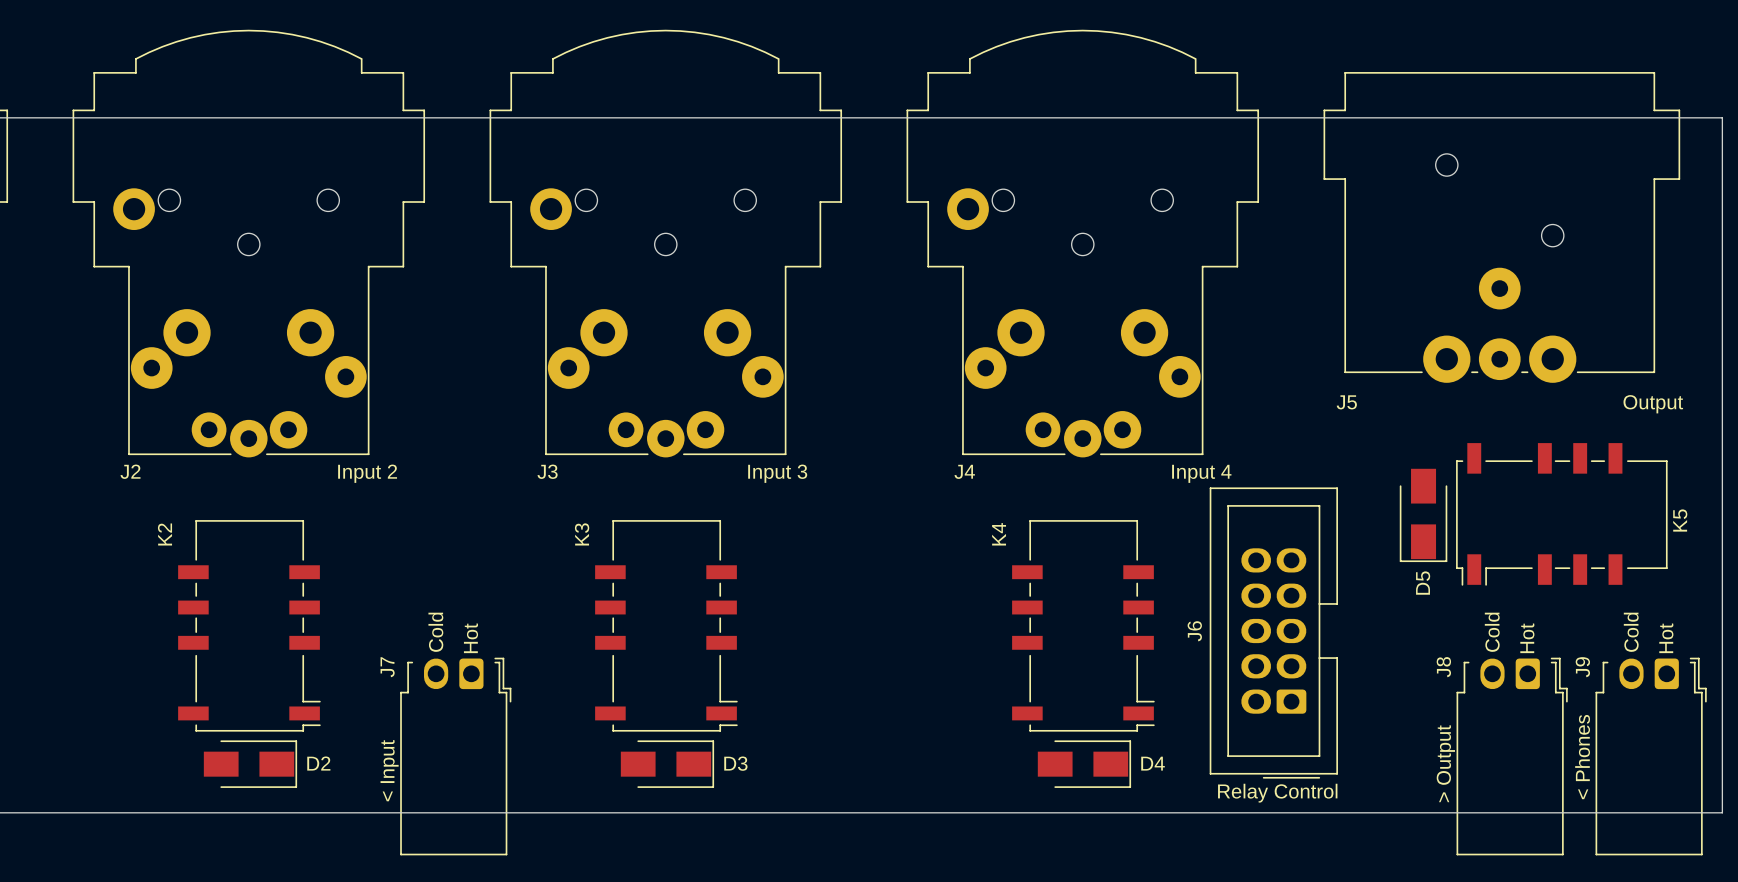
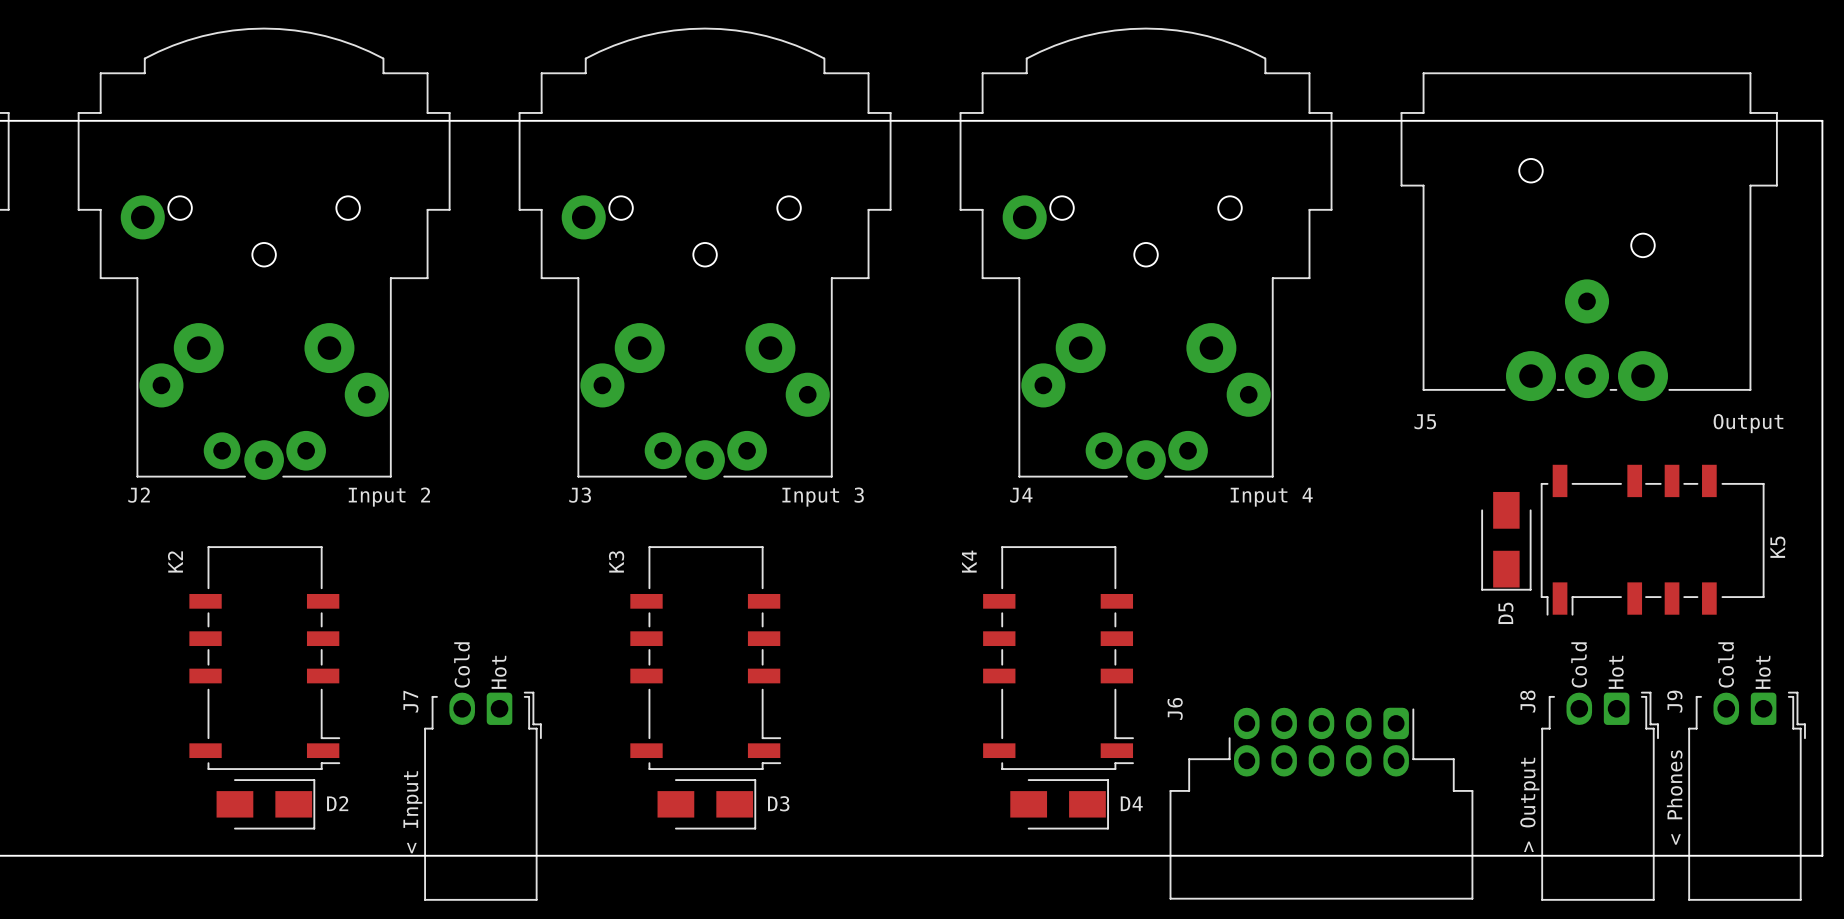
J6 footprint: [1209, 487, 1338, 779] -> [1169, 707, 1474, 900]
K4 position: (1083, 625) -> (1058, 658)
J6 name position: J6 (1194, 631) -> J6 (1175, 708)
D4 position: (1084, 764) -> (1059, 804)

